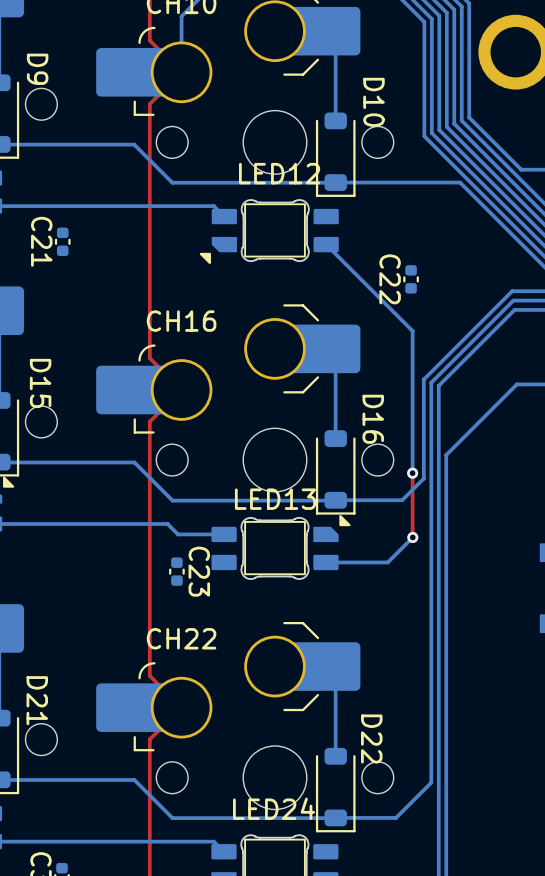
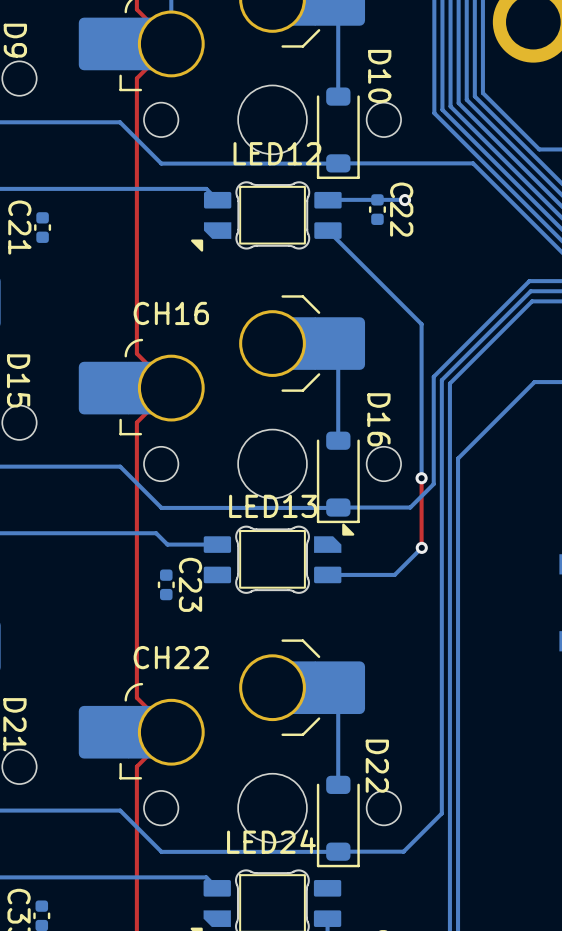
bottom track: none -> (404, 199) (327, 200)
via: none -> (404, 200)
C22 name position: C22 (390, 279) -> C22 (401, 209)
C22 position: (411, 279) -> (377, 209)

